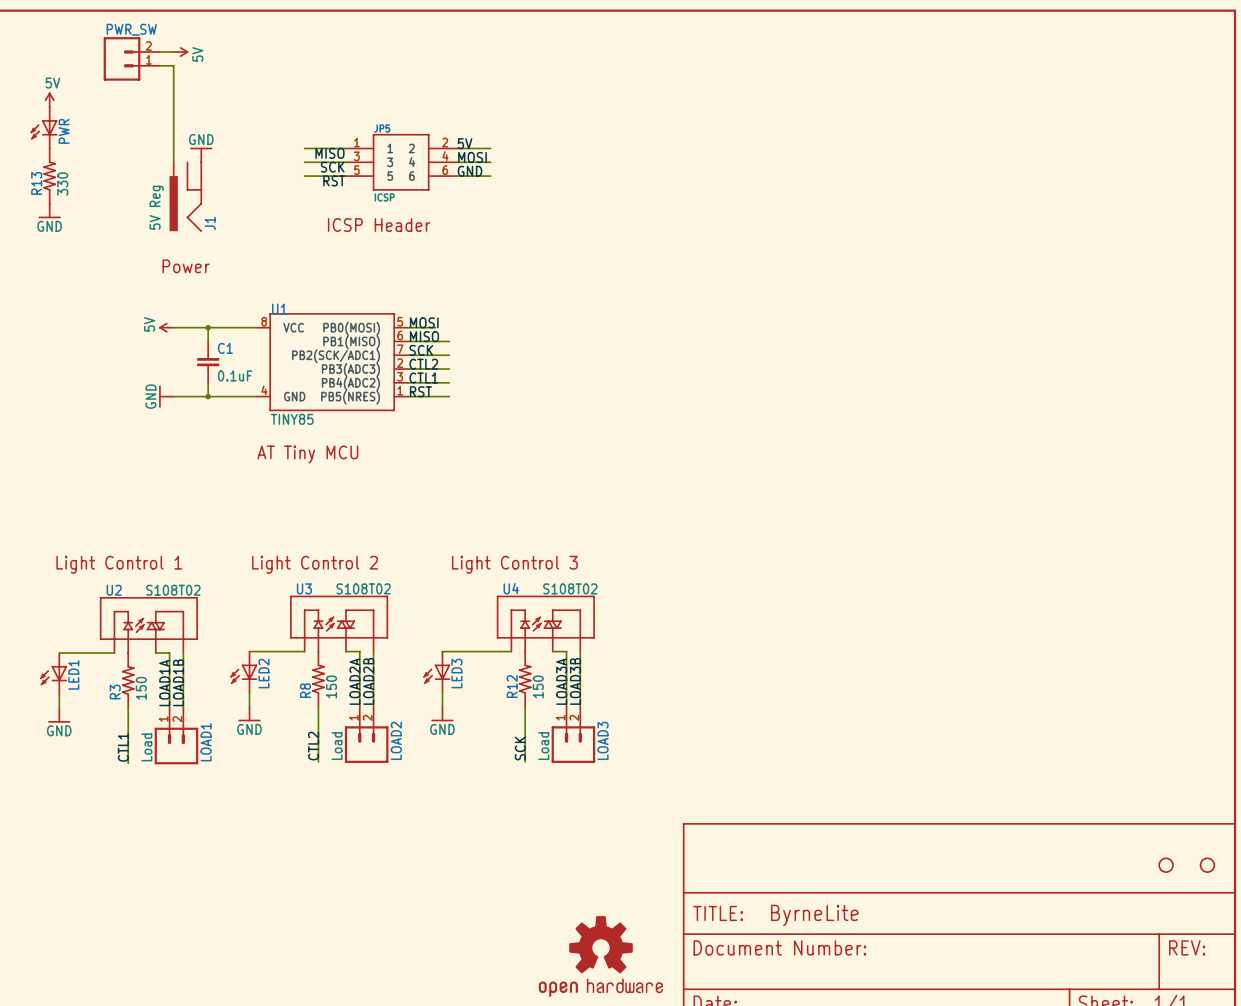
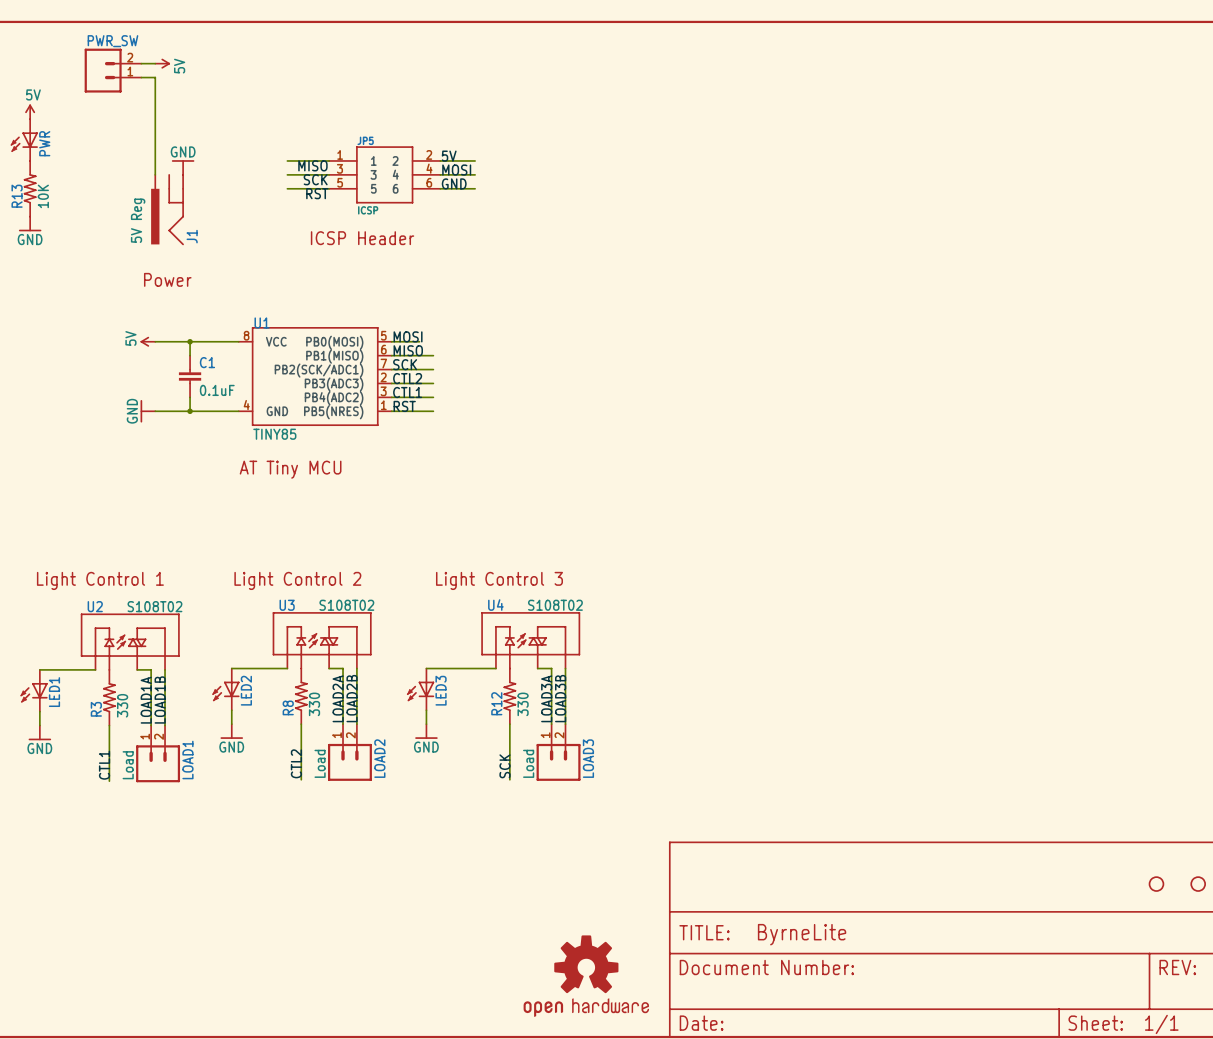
R13 value: 330 (62, 184) -> 10K (43, 196)
R8 value: 150 (331, 686) -> 330 (314, 704)
R12 value: 150 (538, 686) -> 330 (523, 704)
R3 value: 150 (141, 688) -> 330 (122, 705)

